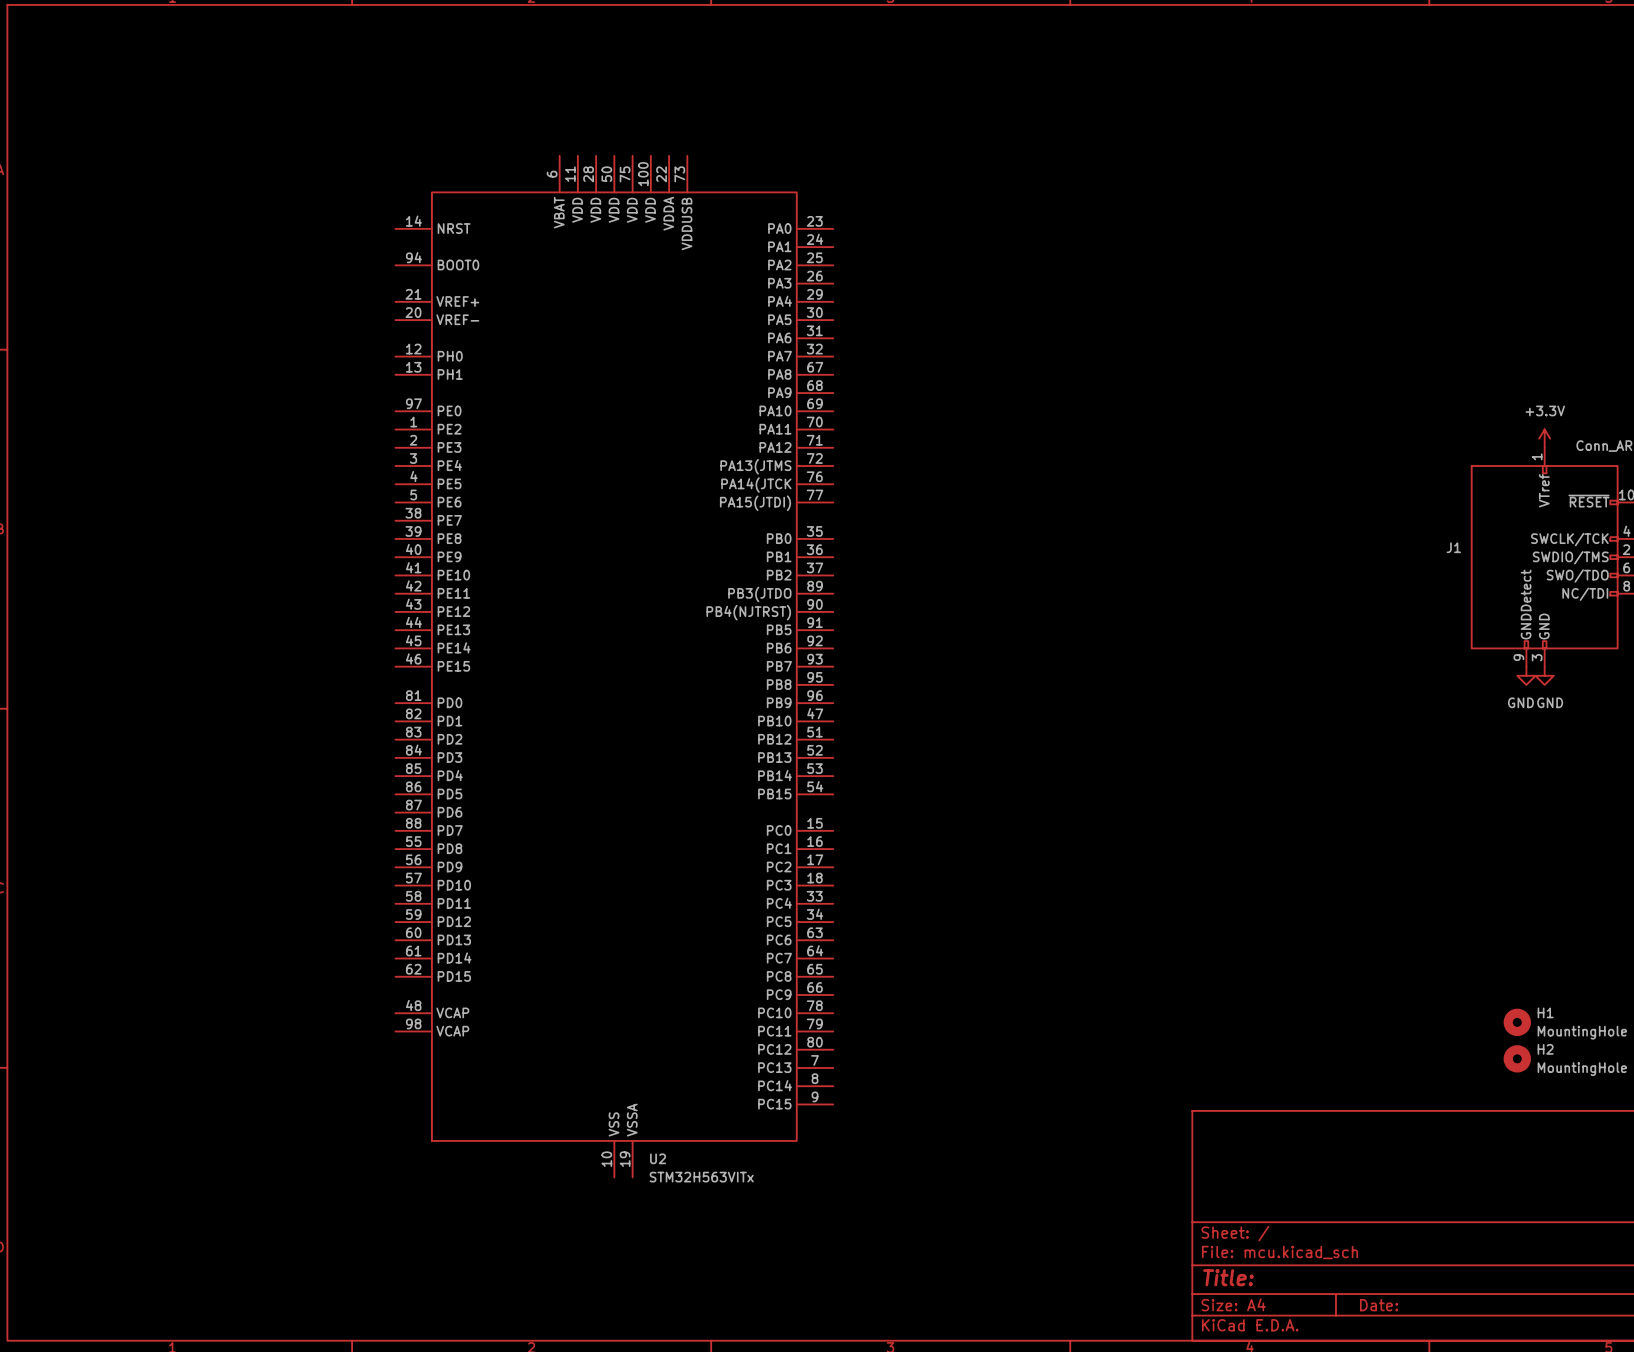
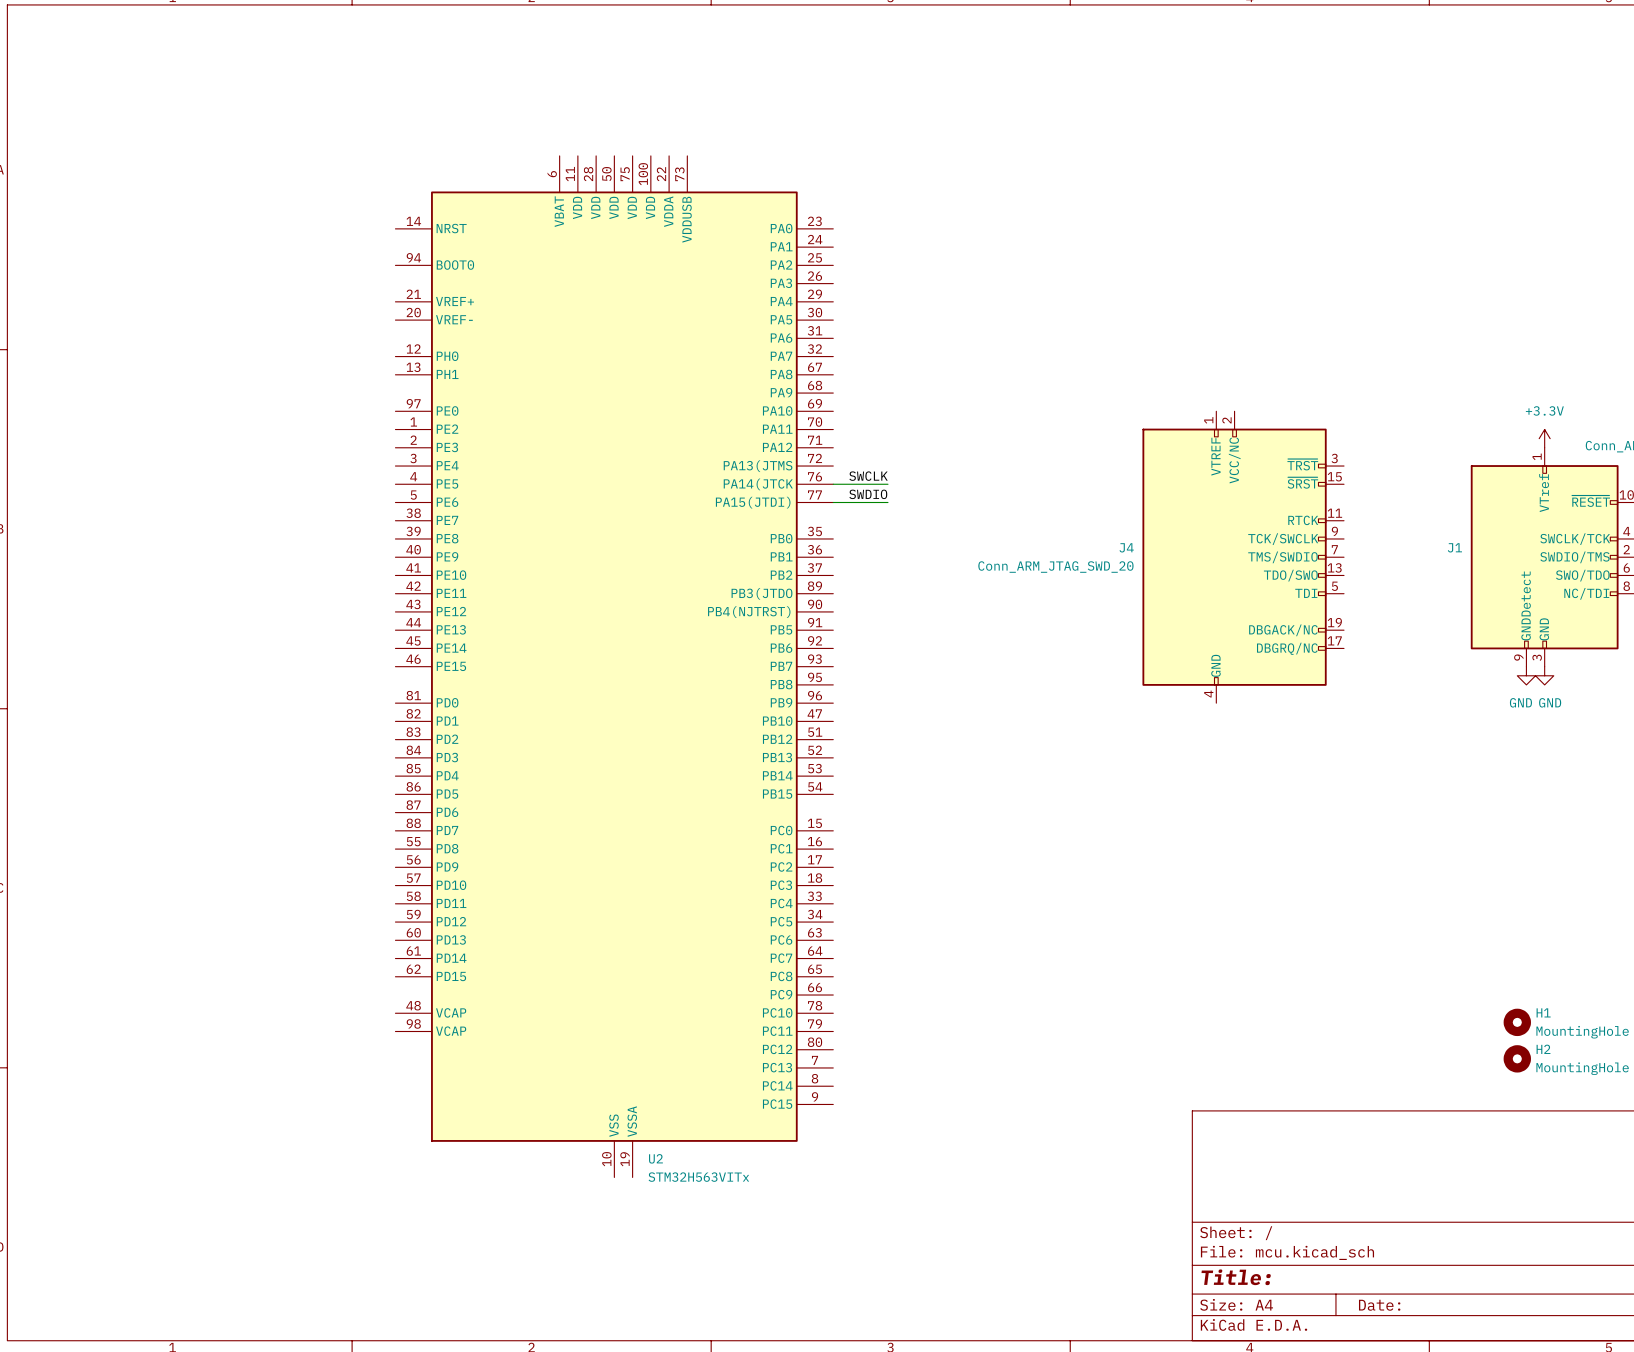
label: none -> SWCLK (868, 476)
wire: none -> (833, 484) (887, 484)
label: none -> SWDIO (868, 494)
wire: none -> (833, 502) (887, 502)
J4: none -> Conn_ARM_JTAG_SWD_20 (1243, 557)

